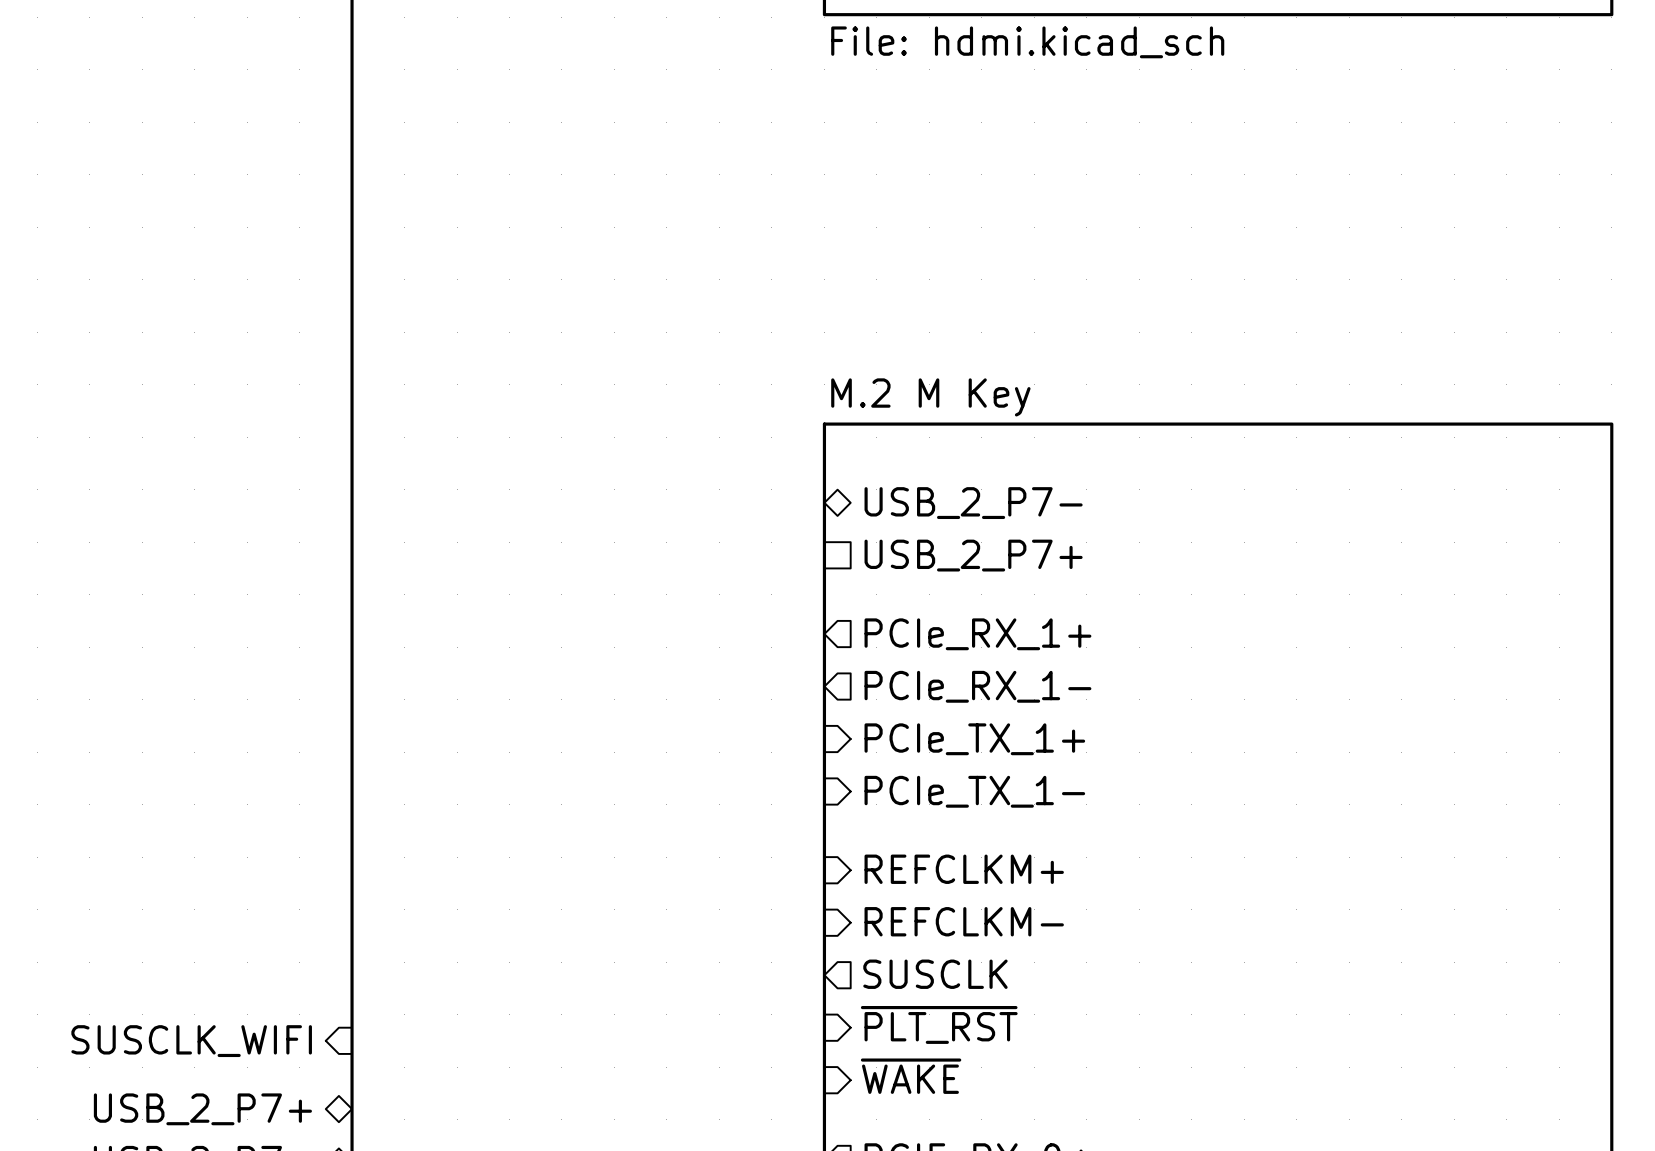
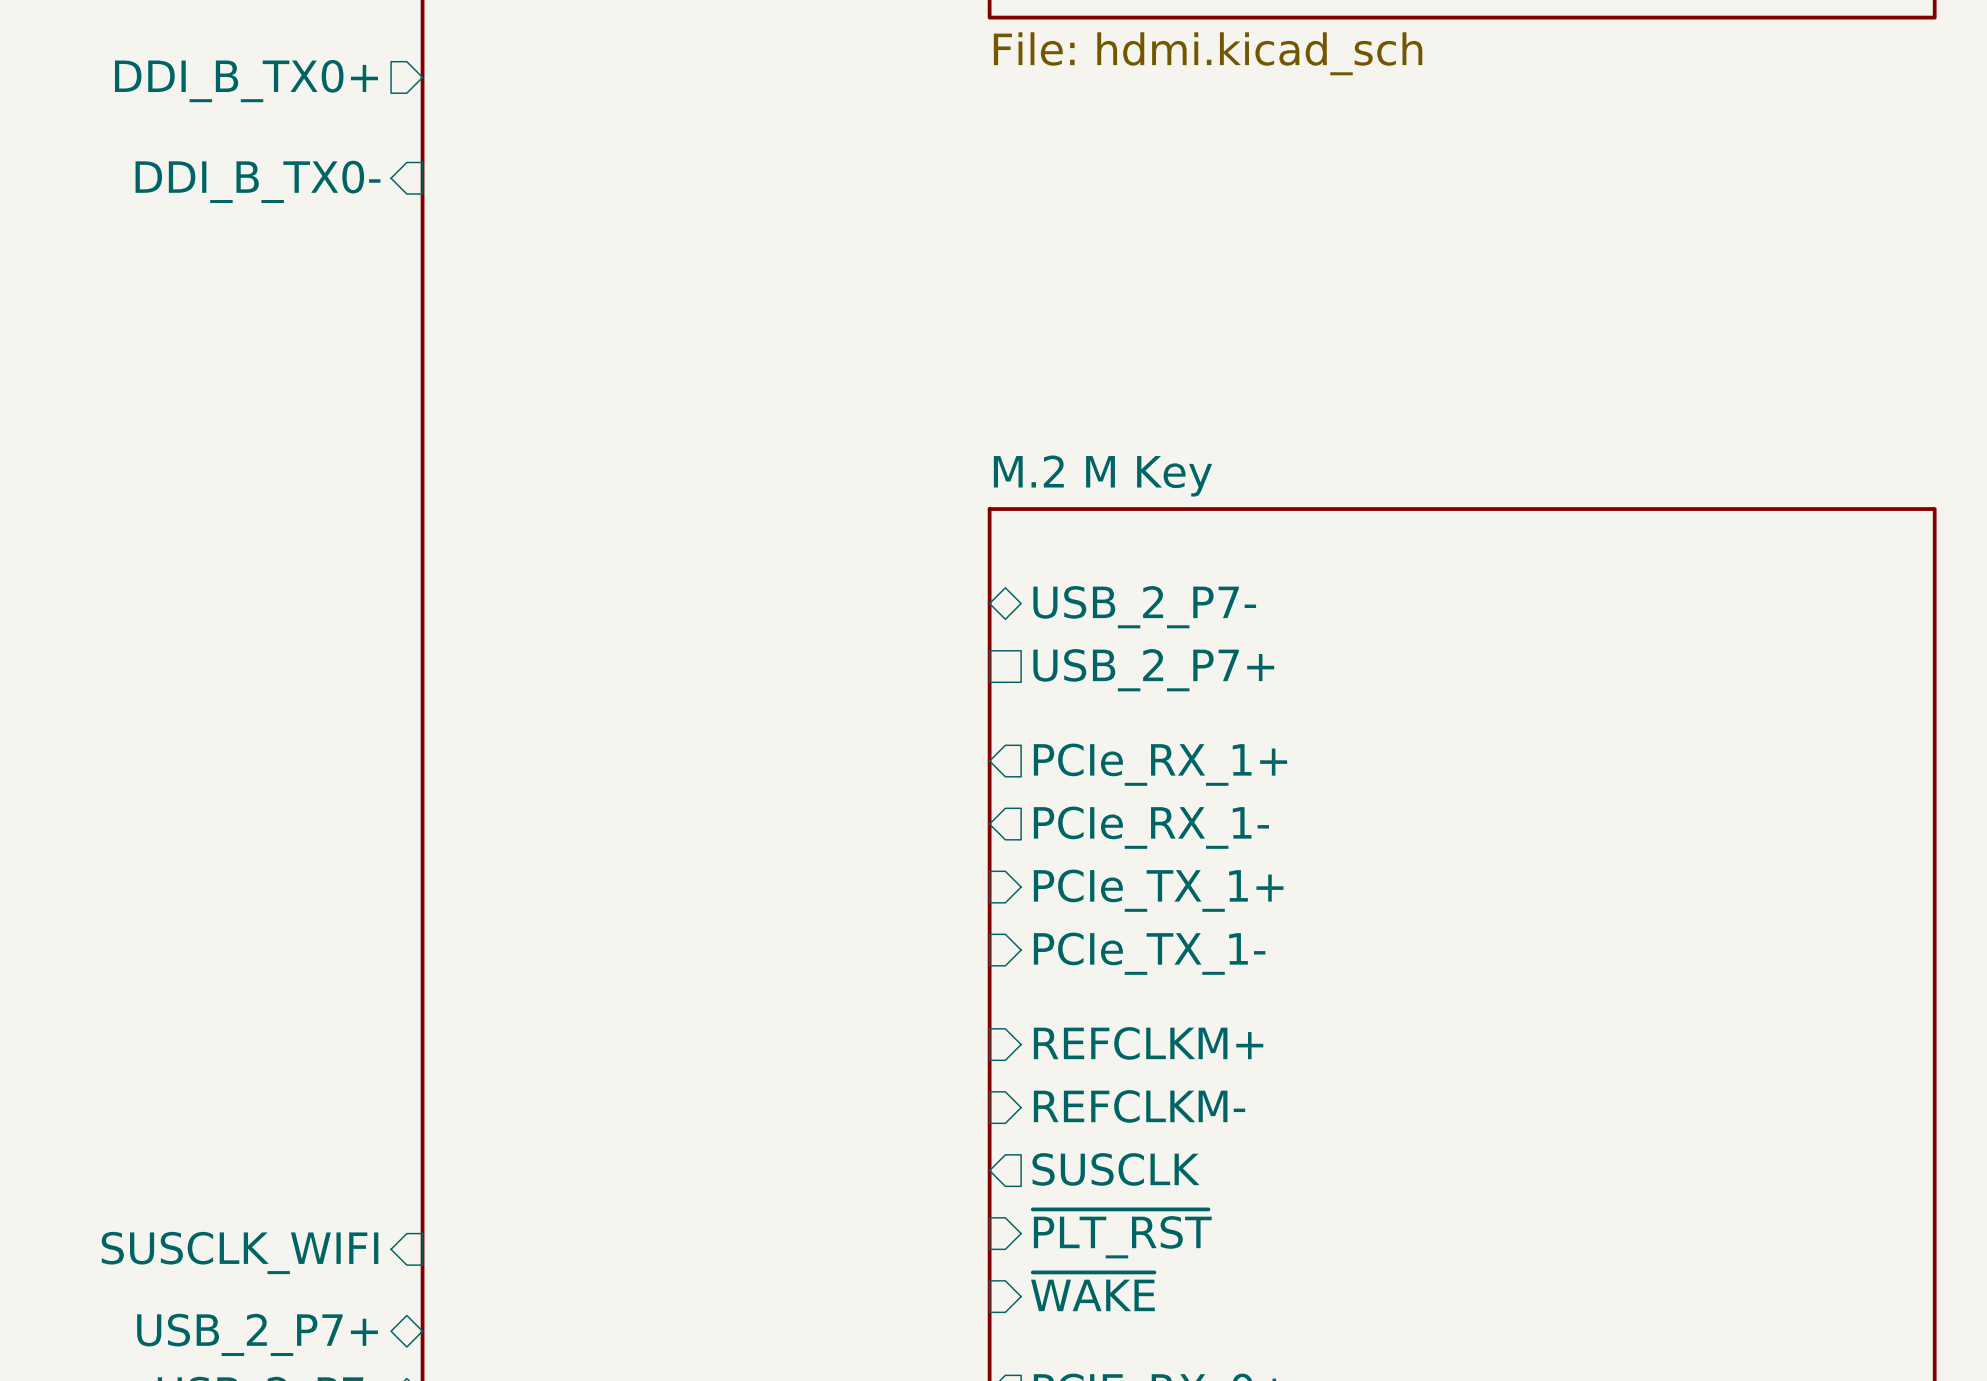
sheet pin: none -> DDI_B_TX0+ (246, 81)
sheet pin: none -> DDI_B_TX0- (258, 181)

